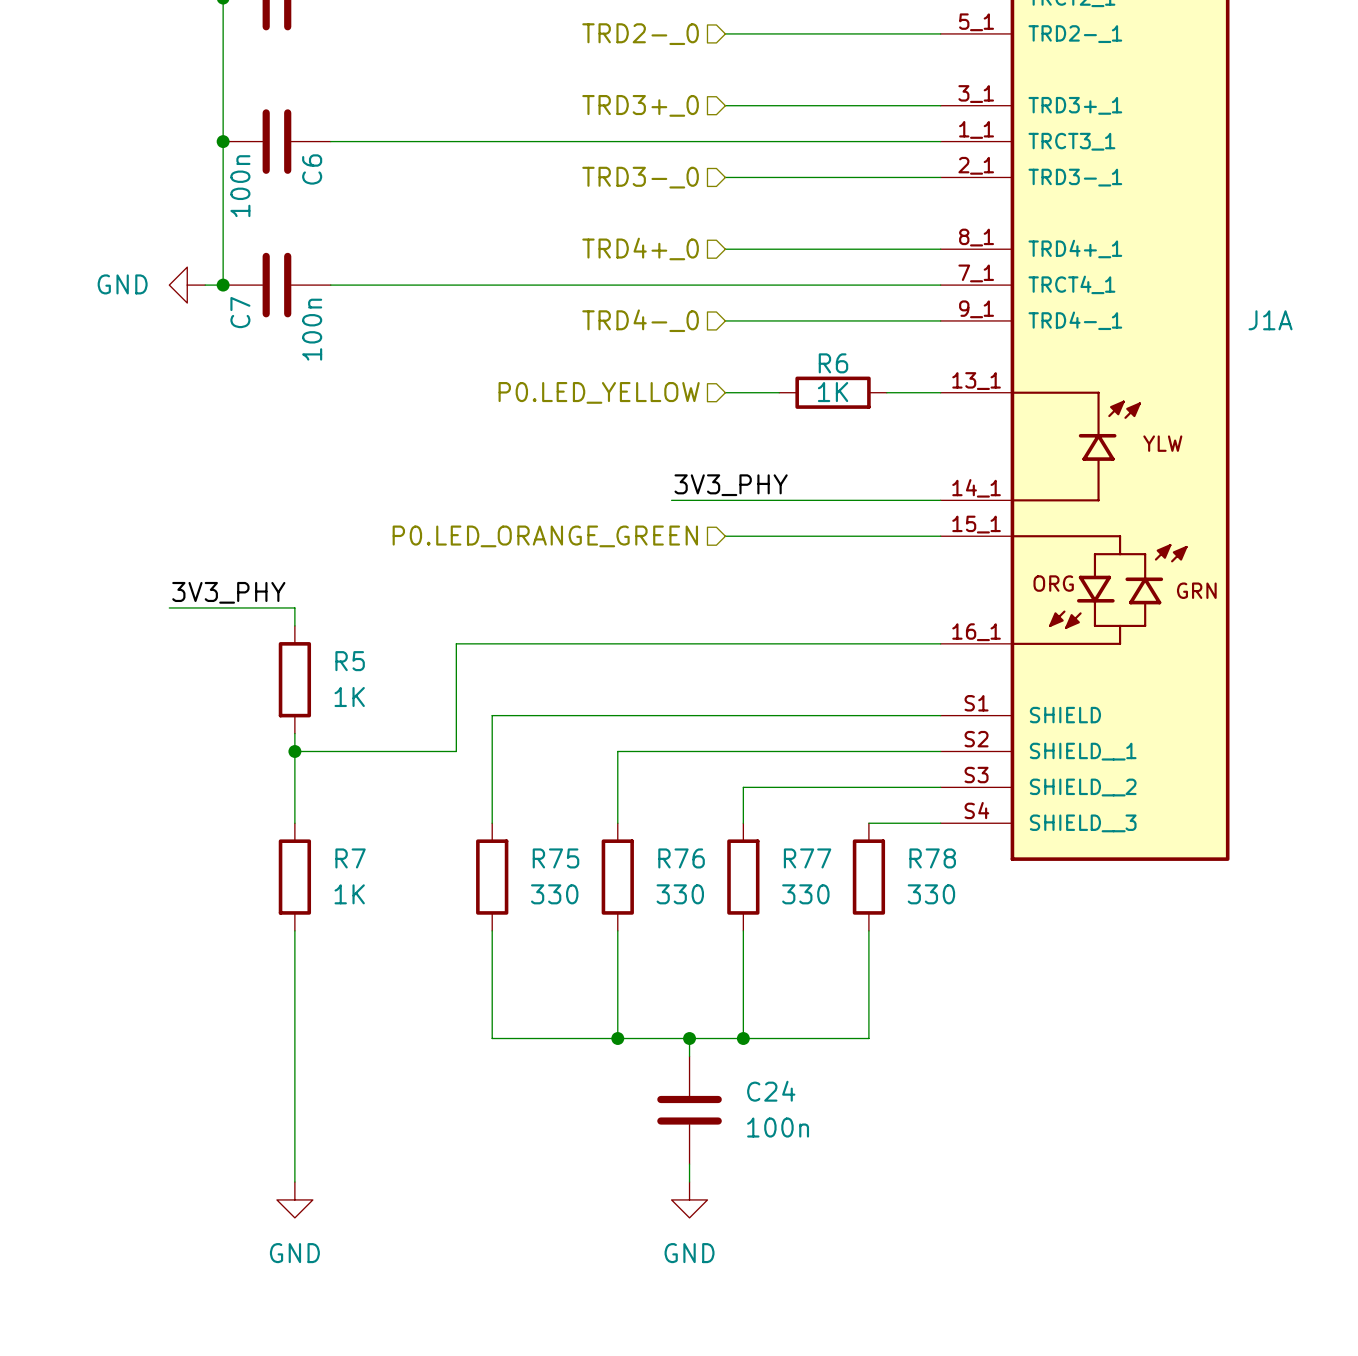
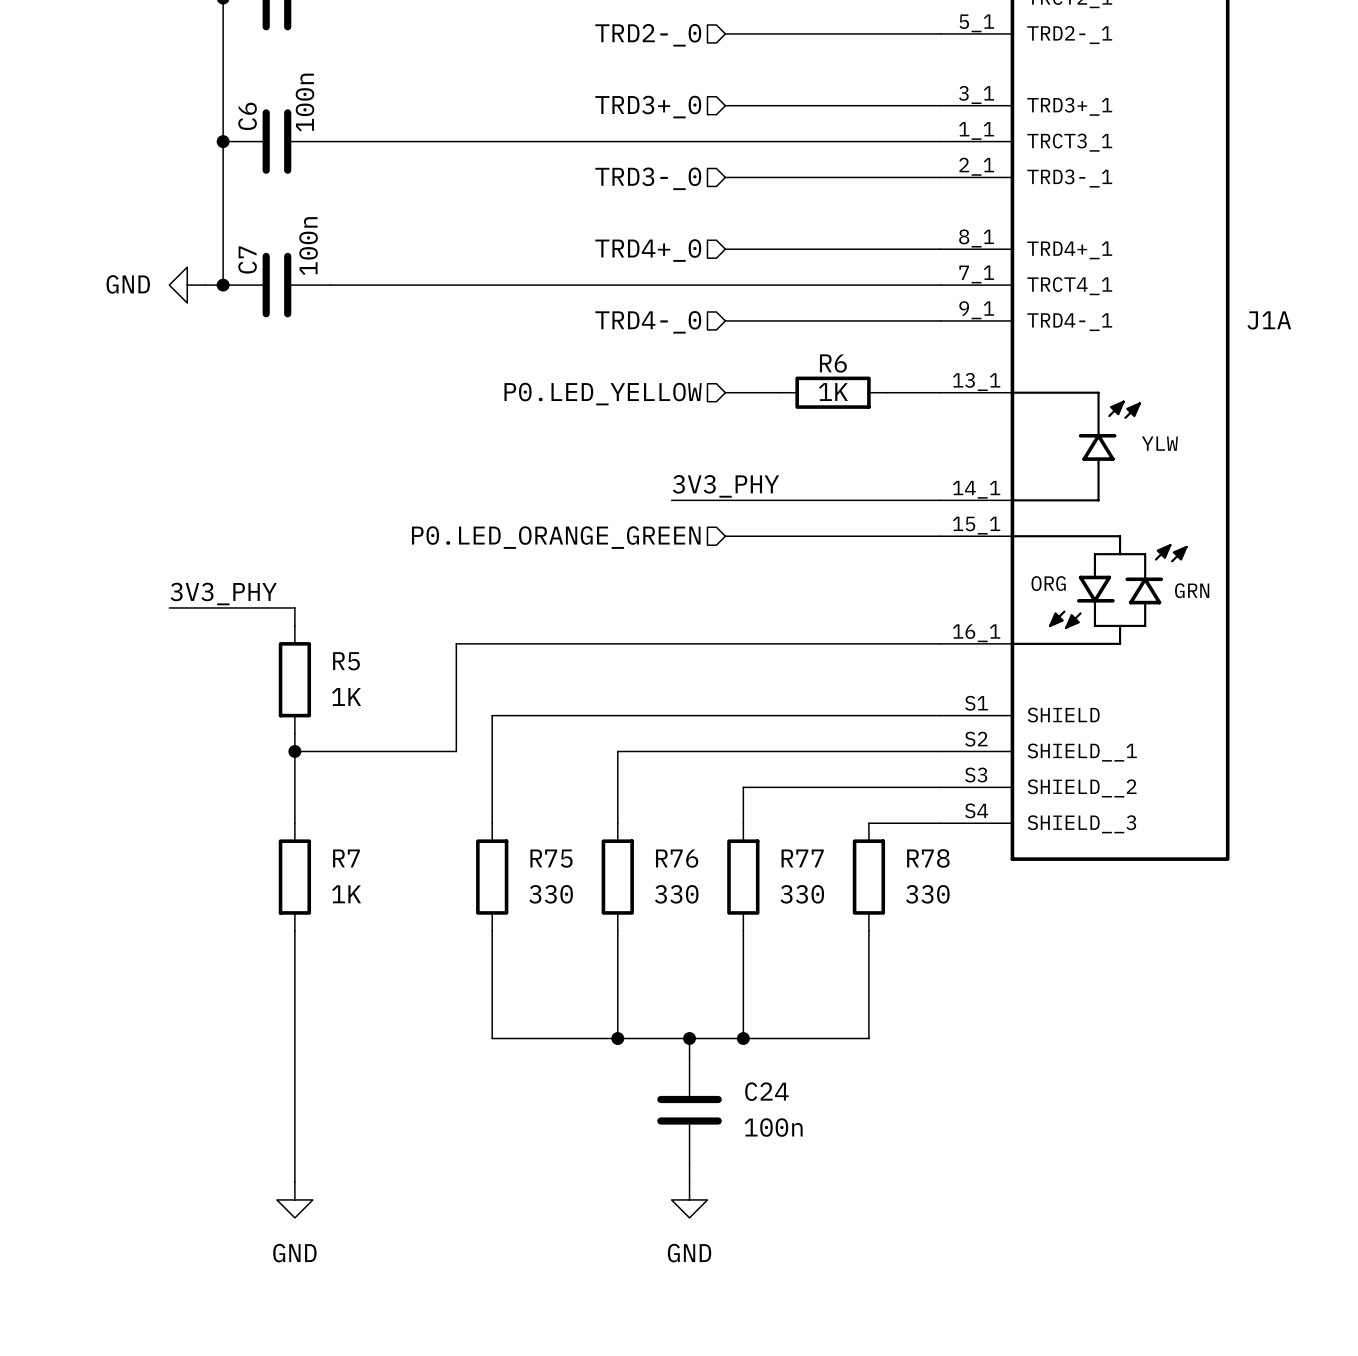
C6 name position: C6 (312, 169) -> C6 (247, 116)
C6 value position: 100n (240, 186) -> 100n (304, 102)
C7 name position: C7 (240, 312) -> C7 (247, 259)
C7 value position: 100n (312, 329) -> 100n (308, 246)

